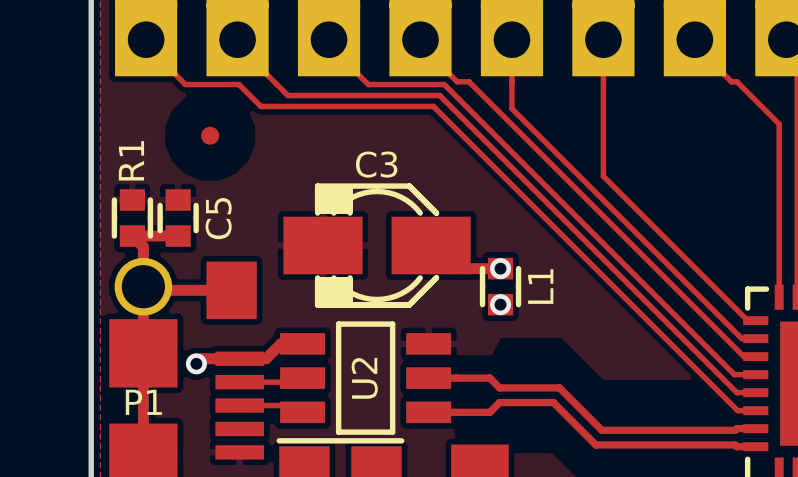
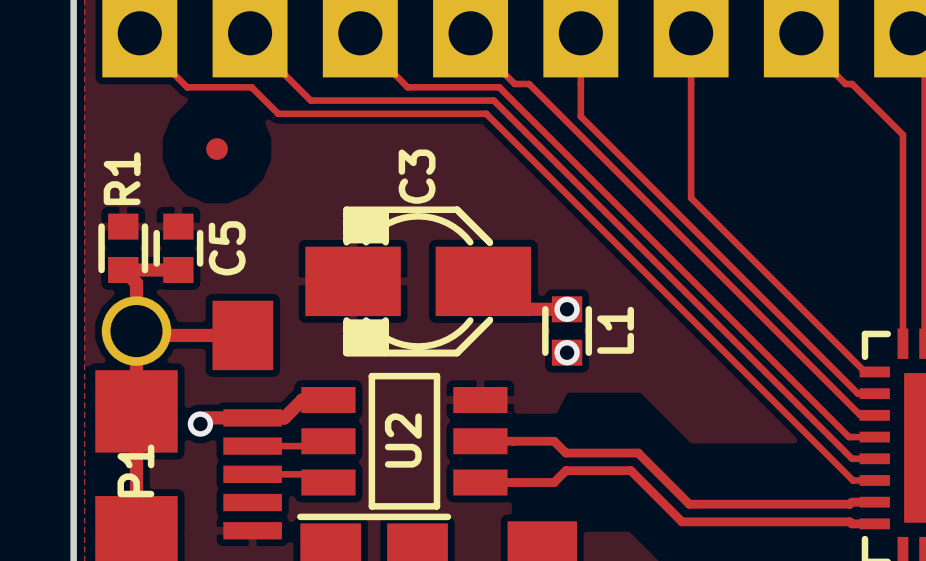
C3 name rotation: 0° (376, 164) -> 90° counterclockwise (417, 176)
P1 name rotation: 0° (143, 402) -> 90° counterclockwise (135, 470)

